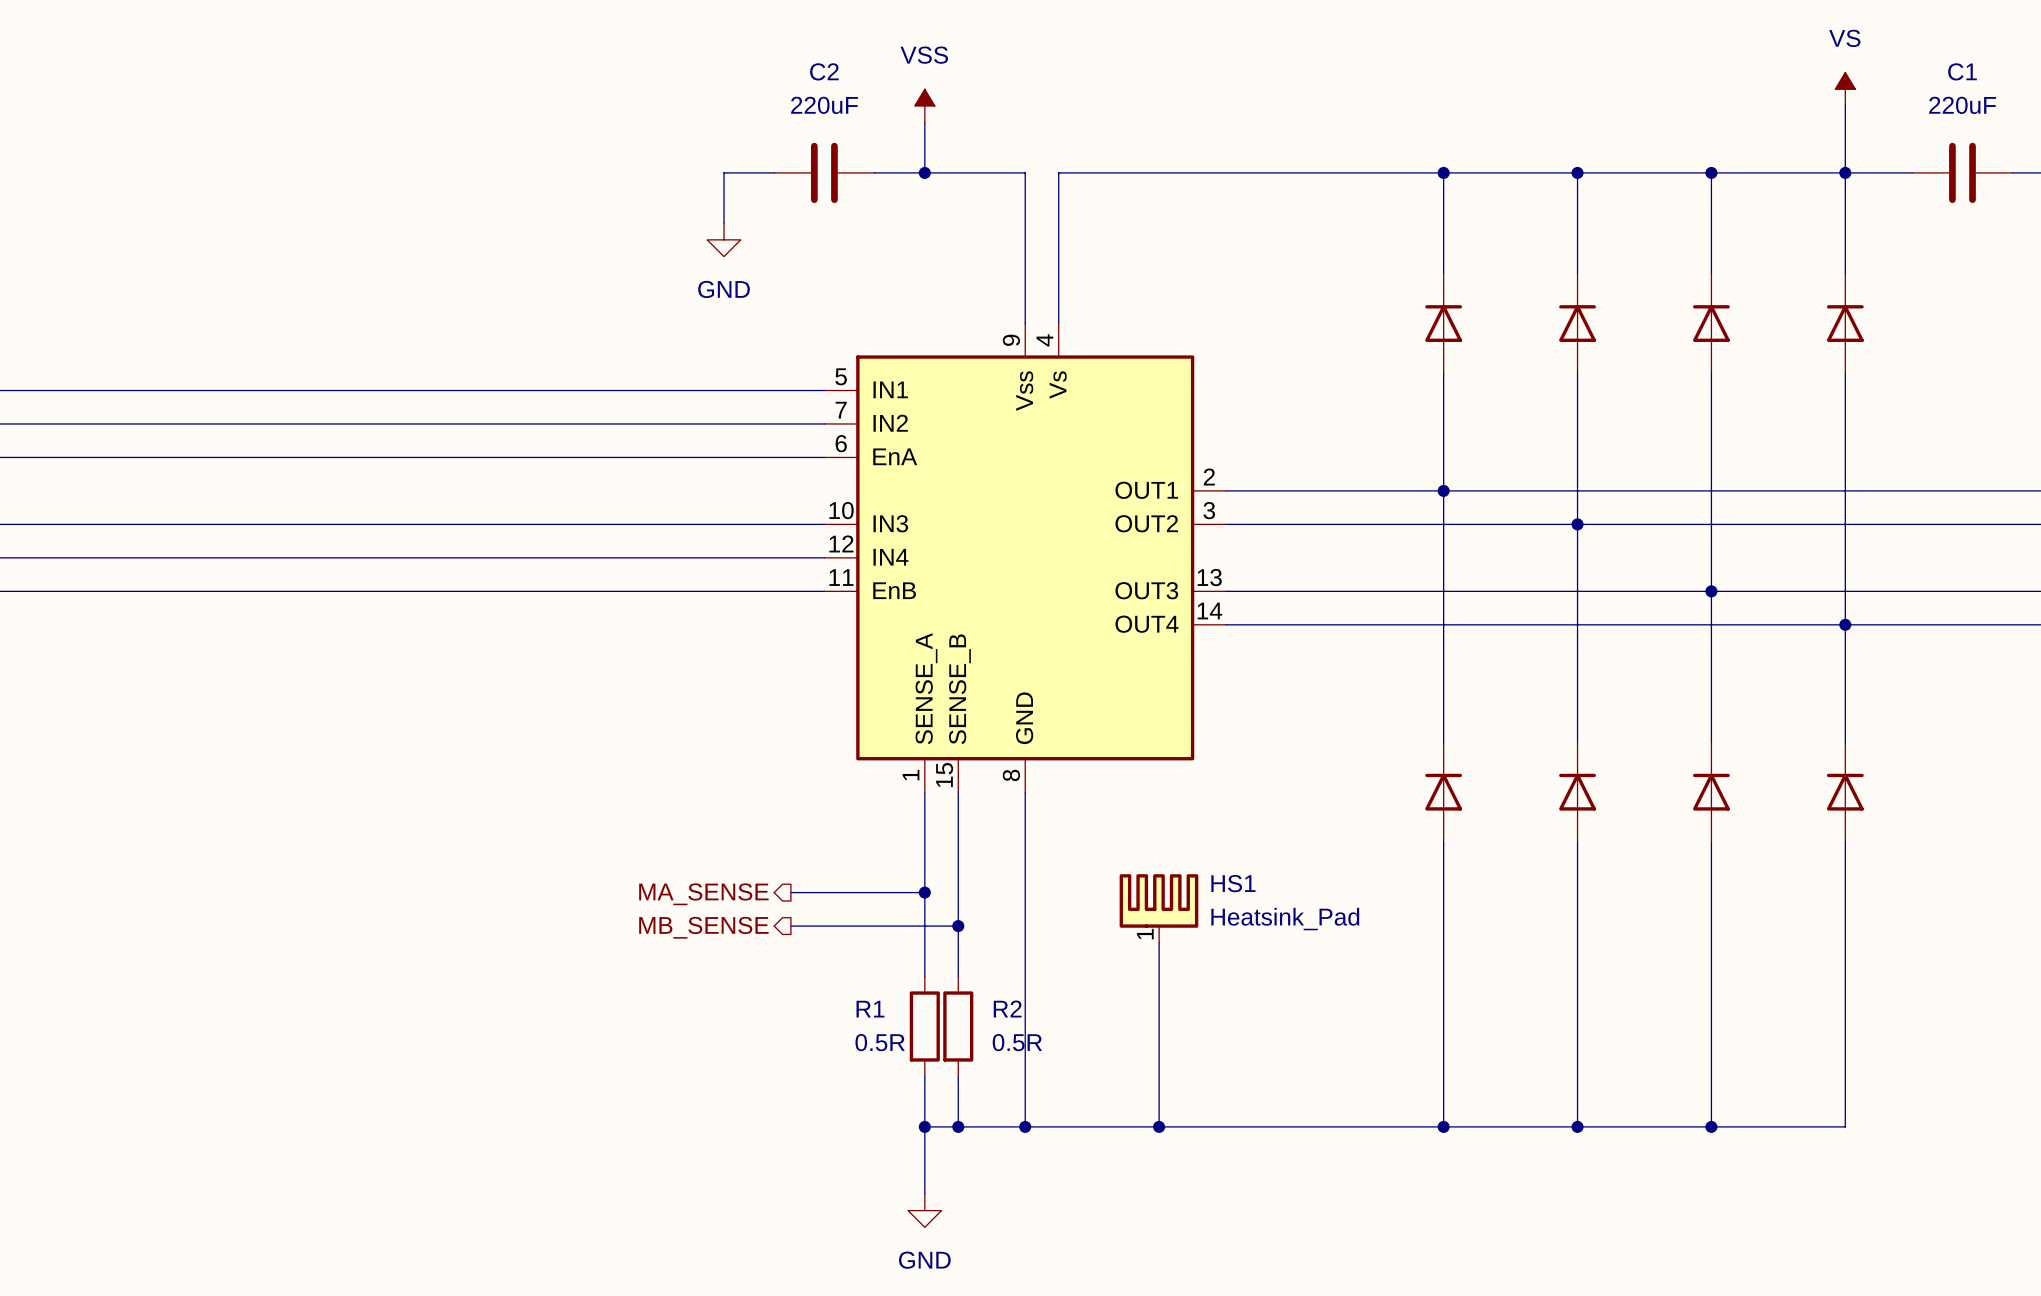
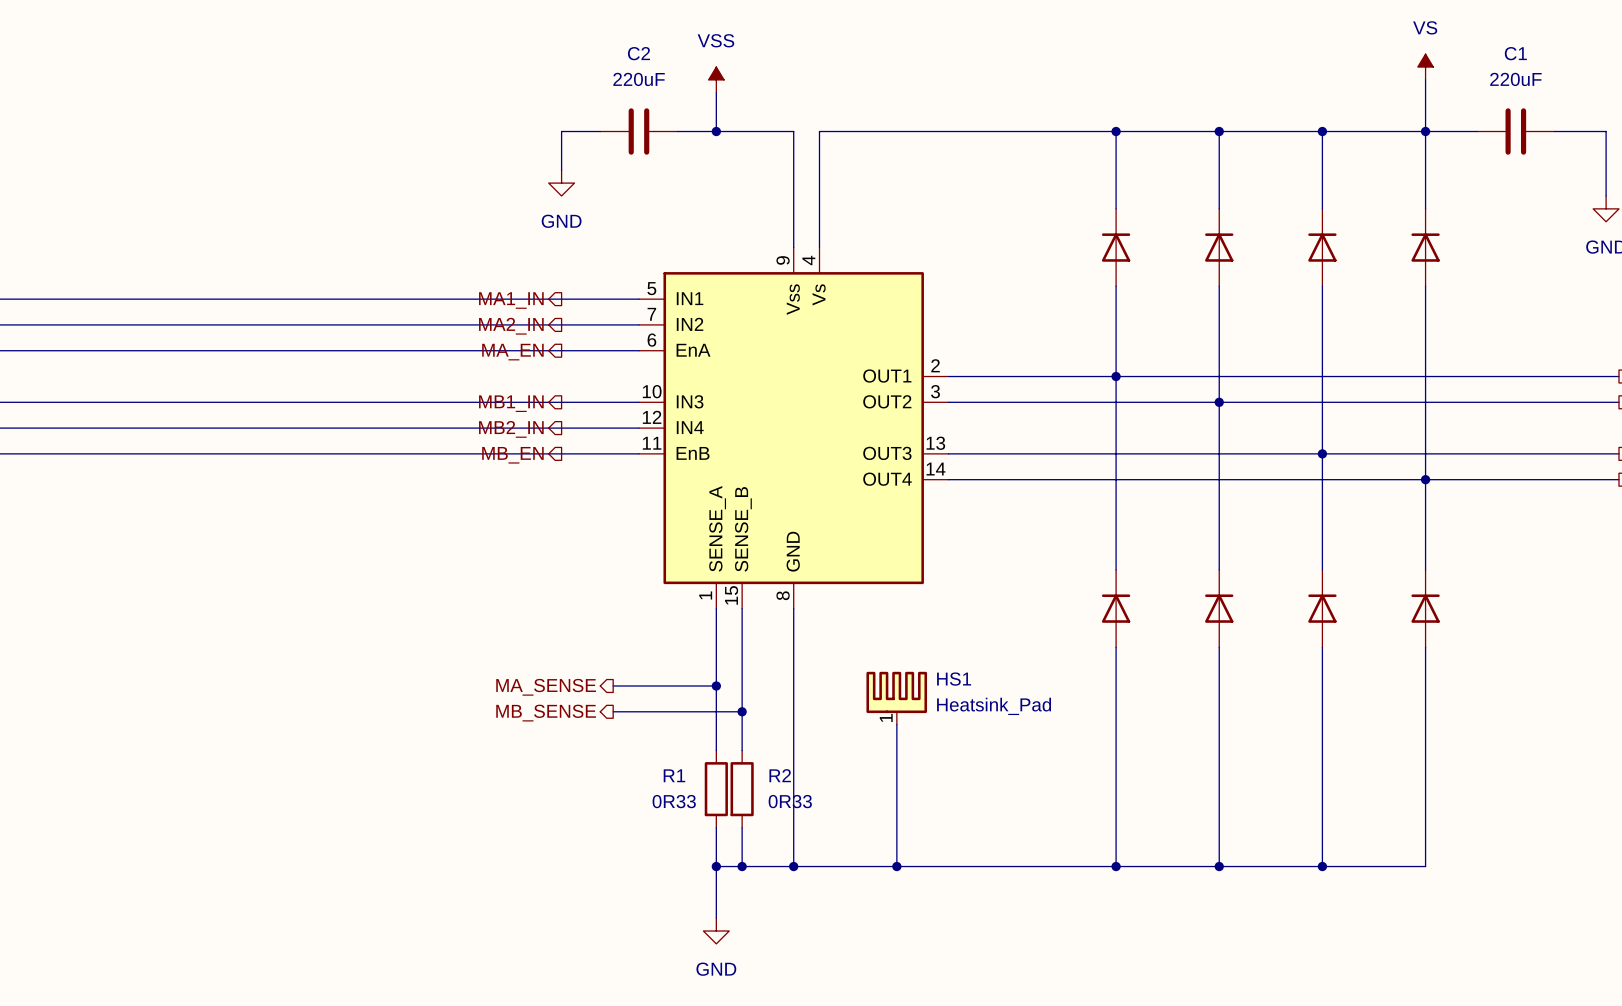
hierarchical label: none -> MA1_IN (511, 300)
hierarchical label: none -> MA2_IN (511, 326)
hierarchical label: none -> MA_EN (512, 352)
hierarchical label: none -> MB1_IN (511, 403)
hierarchical label: none -> MB2_IN (511, 429)
hierarchical label: none -> MB_EN (512, 455)
R1 value: 0.5R (880, 1042) -> 0R33 (674, 801)
R2 value: 0.5R (1017, 1042) -> 0R33 (790, 801)

